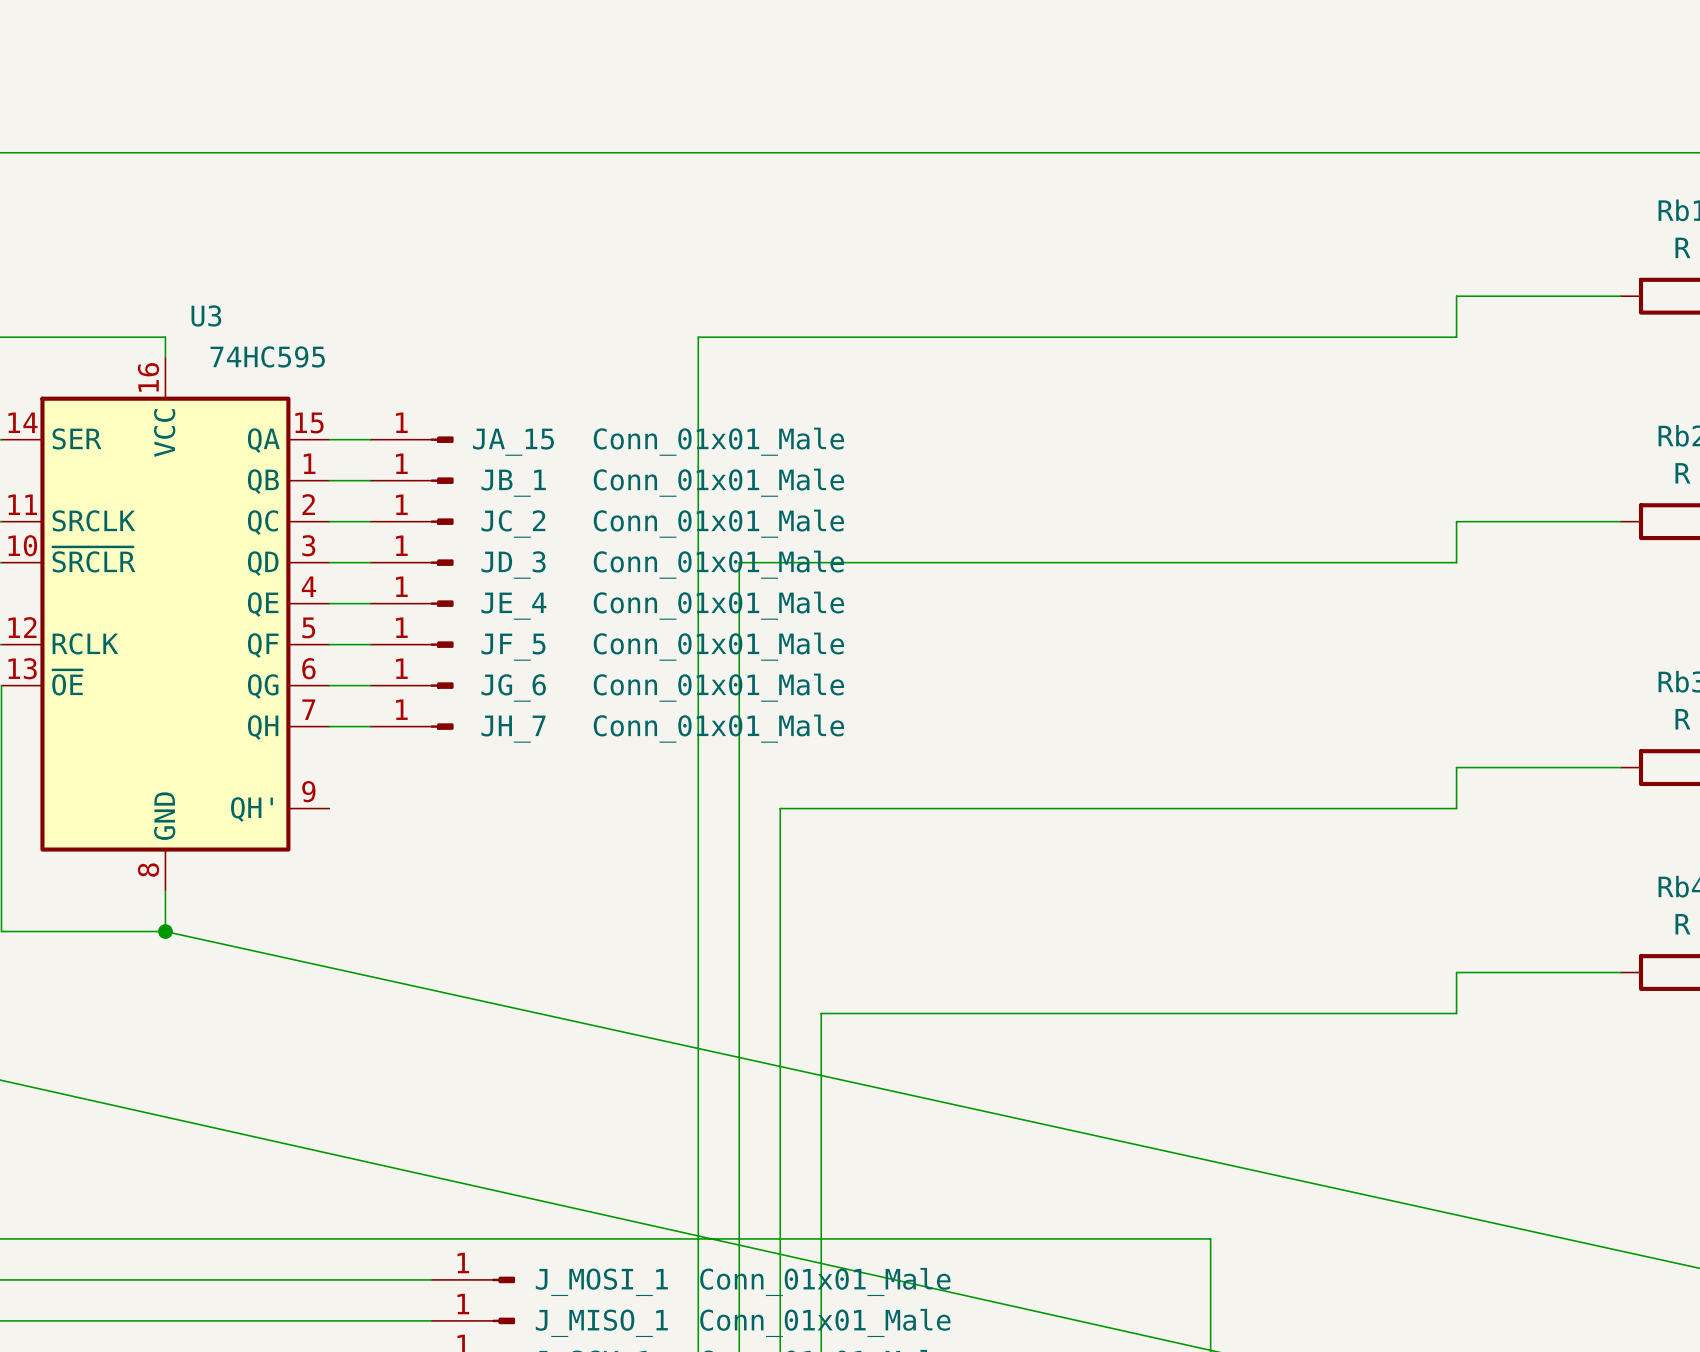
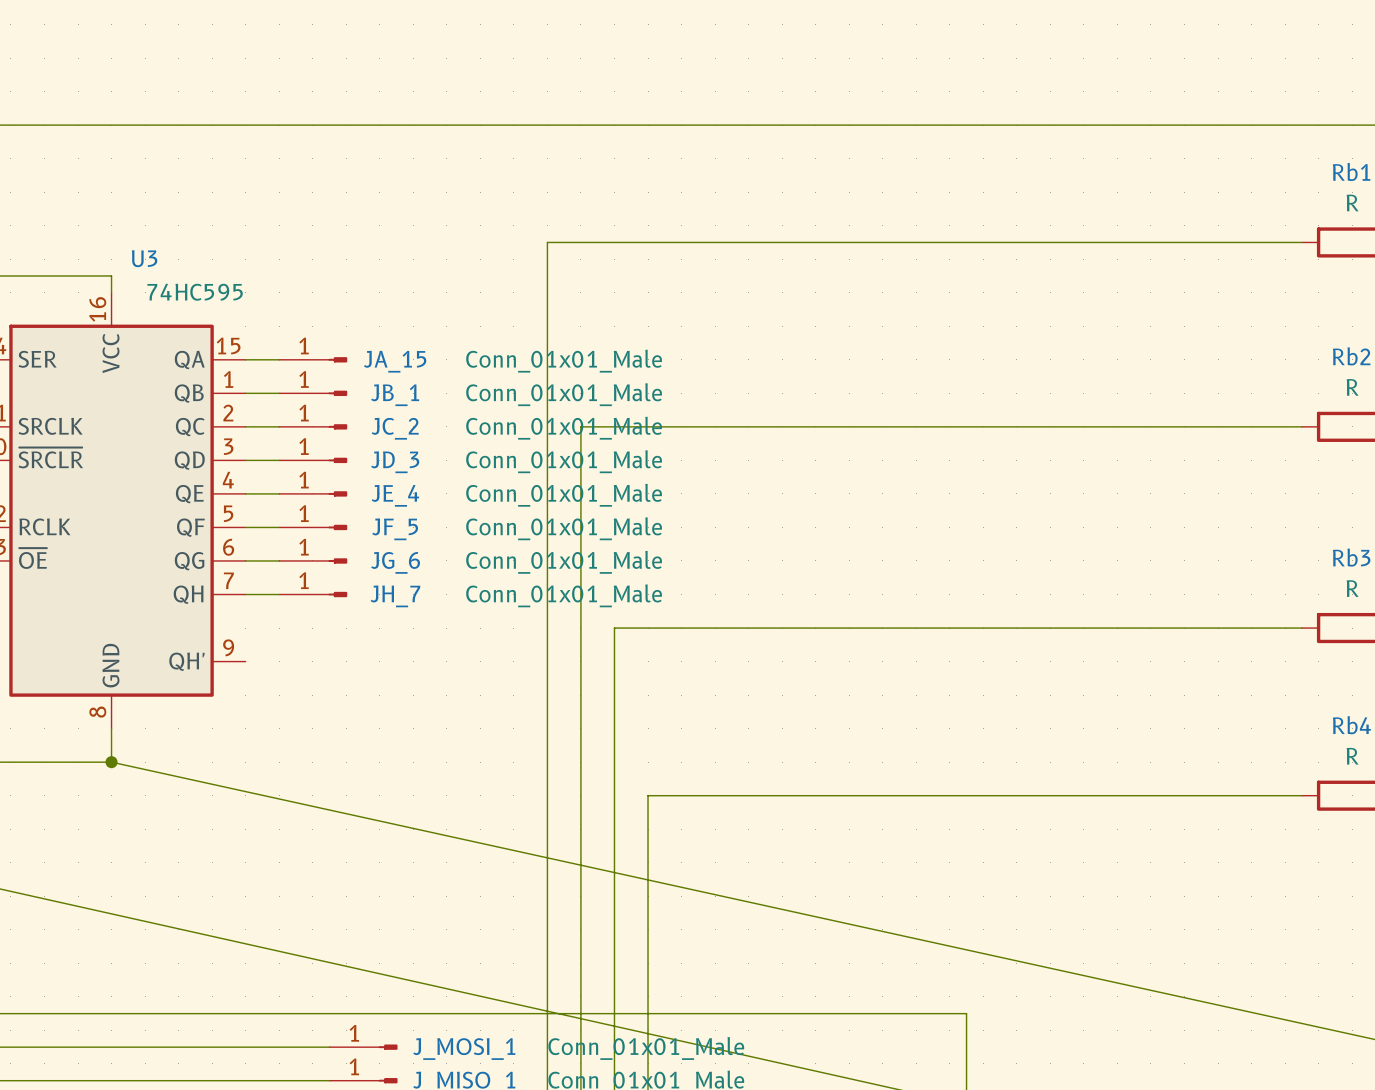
wire: (1456, 296) (1456, 337) (698, 337) -> (1167, 242) (547, 242) (547, 275)
wire: (1456, 521) (1456, 562) (739, 562) -> (1167, 426) (580, 426) (580, 460)
wire: (1456, 767) (1456, 808) (780, 808) -> (1167, 628) (614, 628) (614, 661)
wire: (1456, 972) (1456, 1013) (821, 1013) -> (1167, 795) (648, 795) (648, 829)

